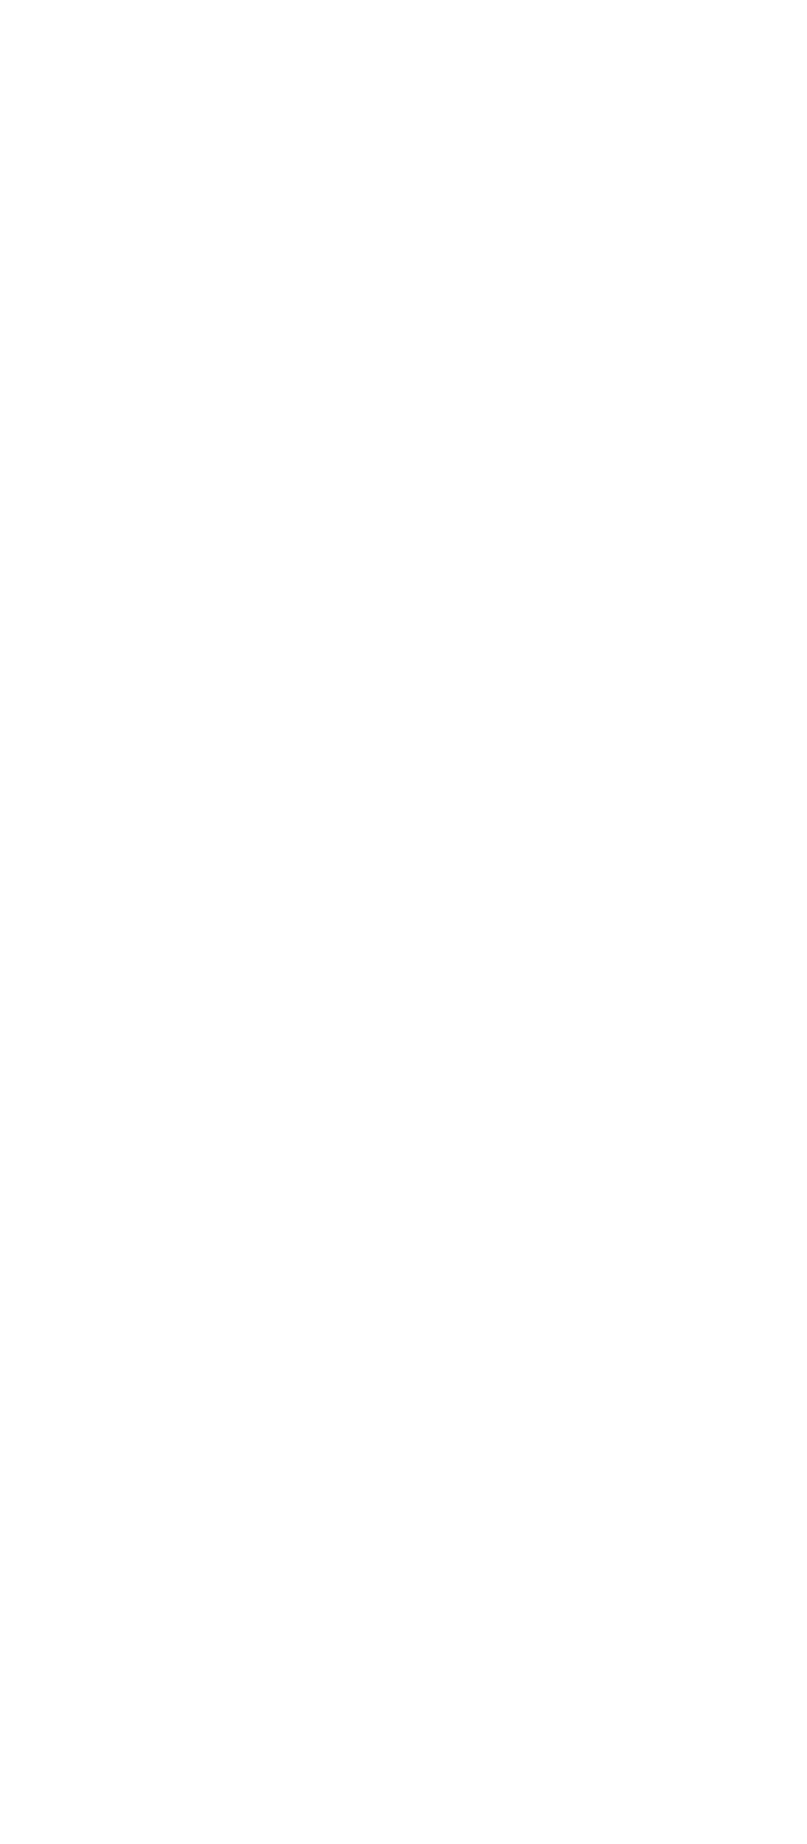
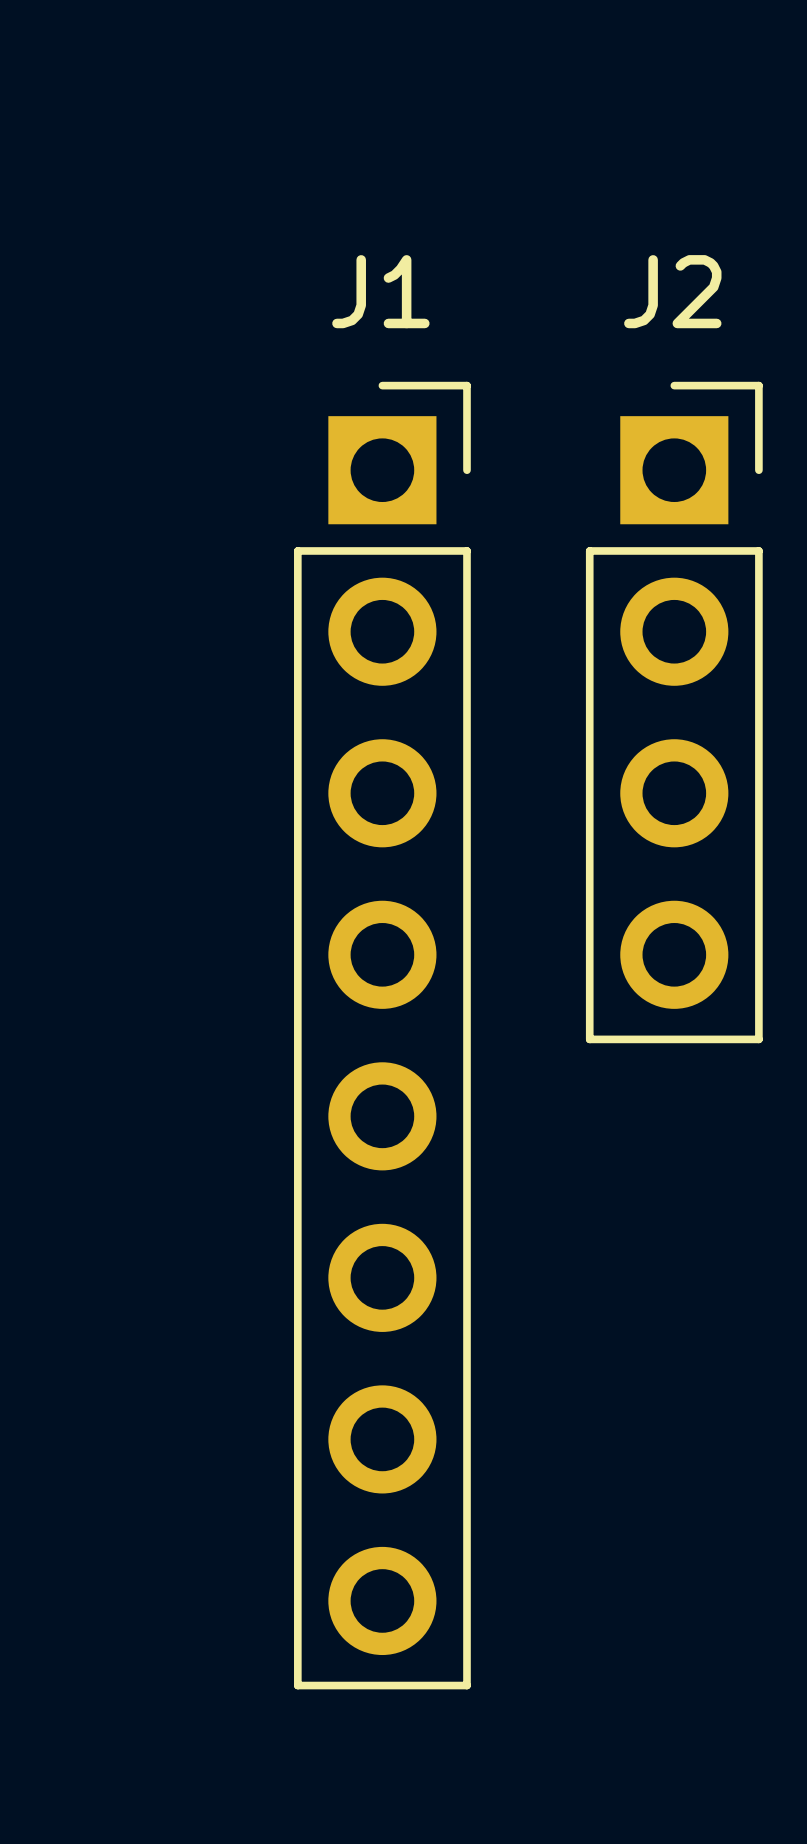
J2: none -> (674, 712)
J1: none -> (382, 1035)

